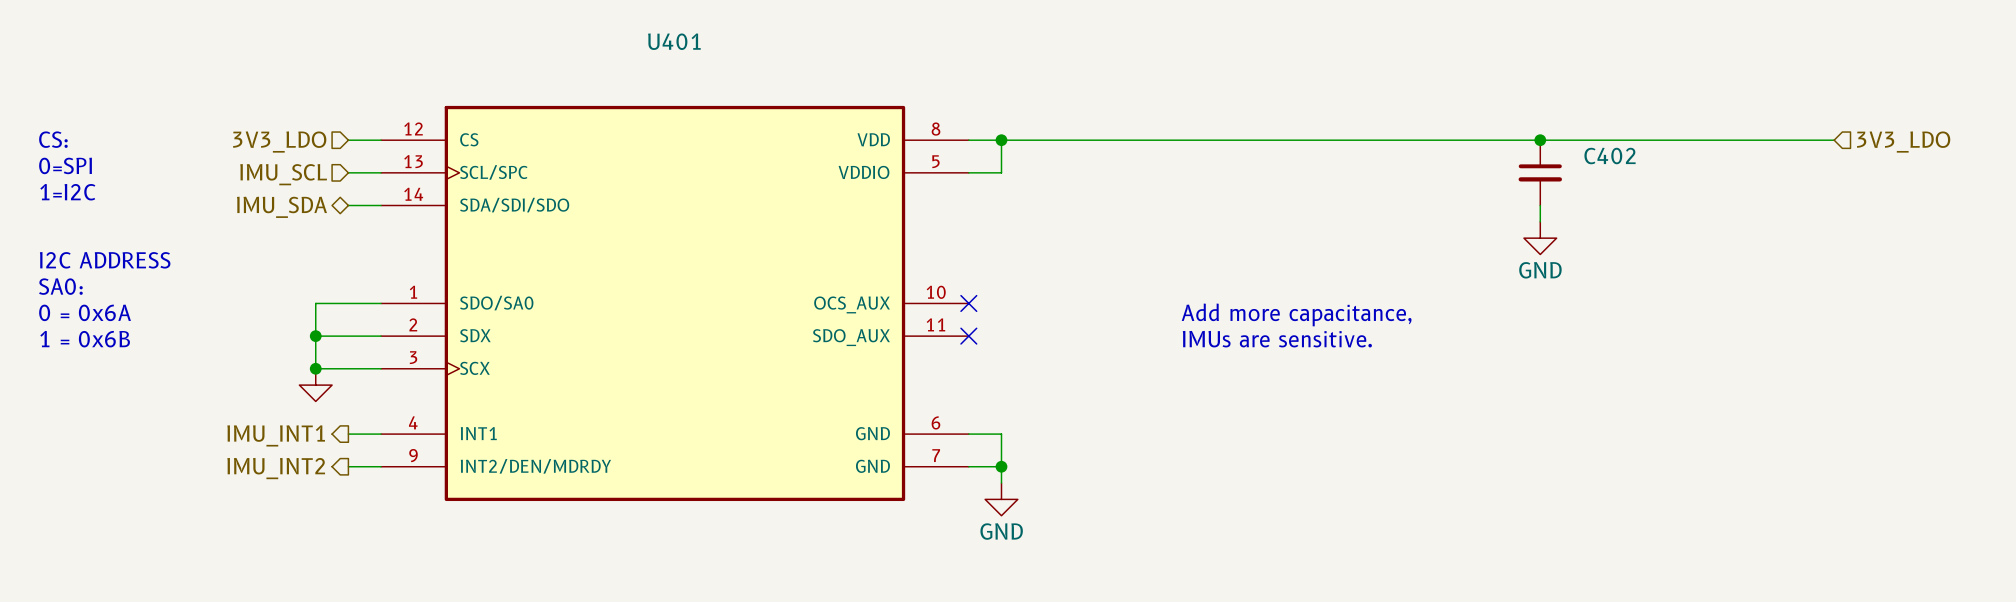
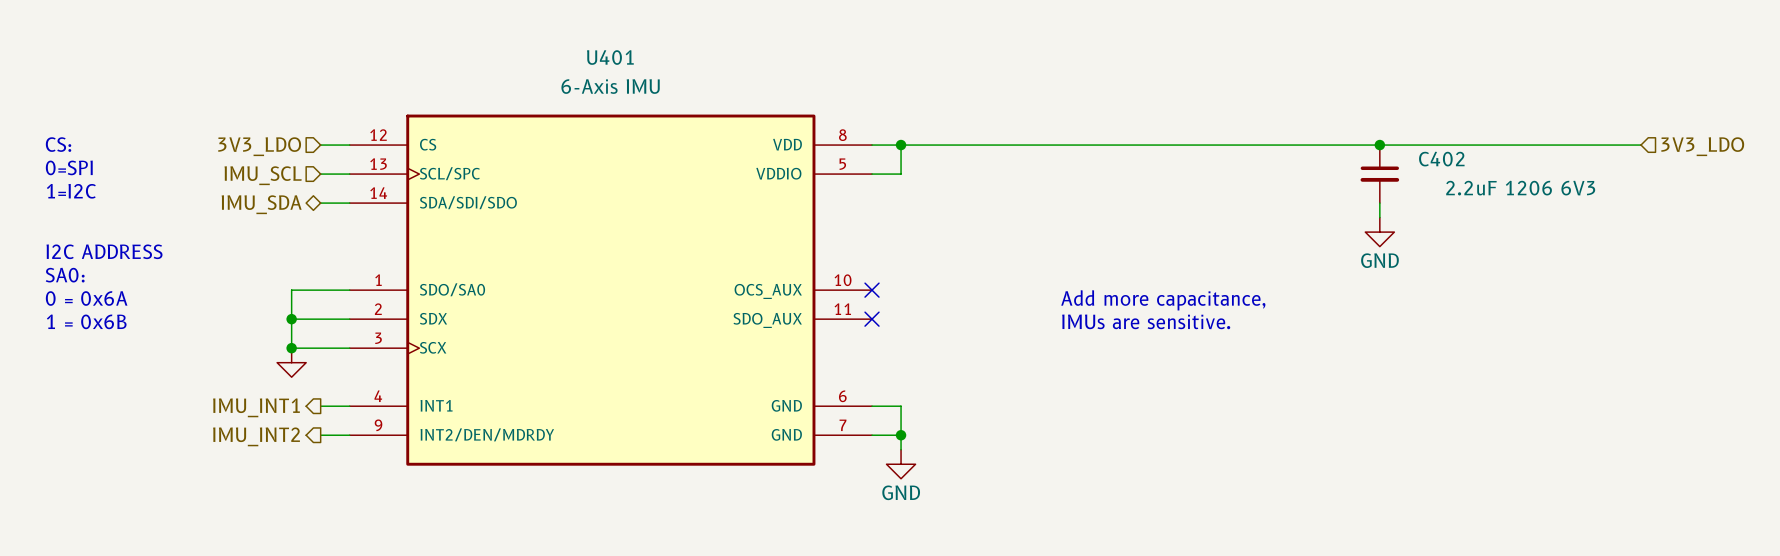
U401 value: none -> 6-Axis IMU (610, 86)
C402 value: none -> 2.2uF 1206 6V3 (1520, 188)

